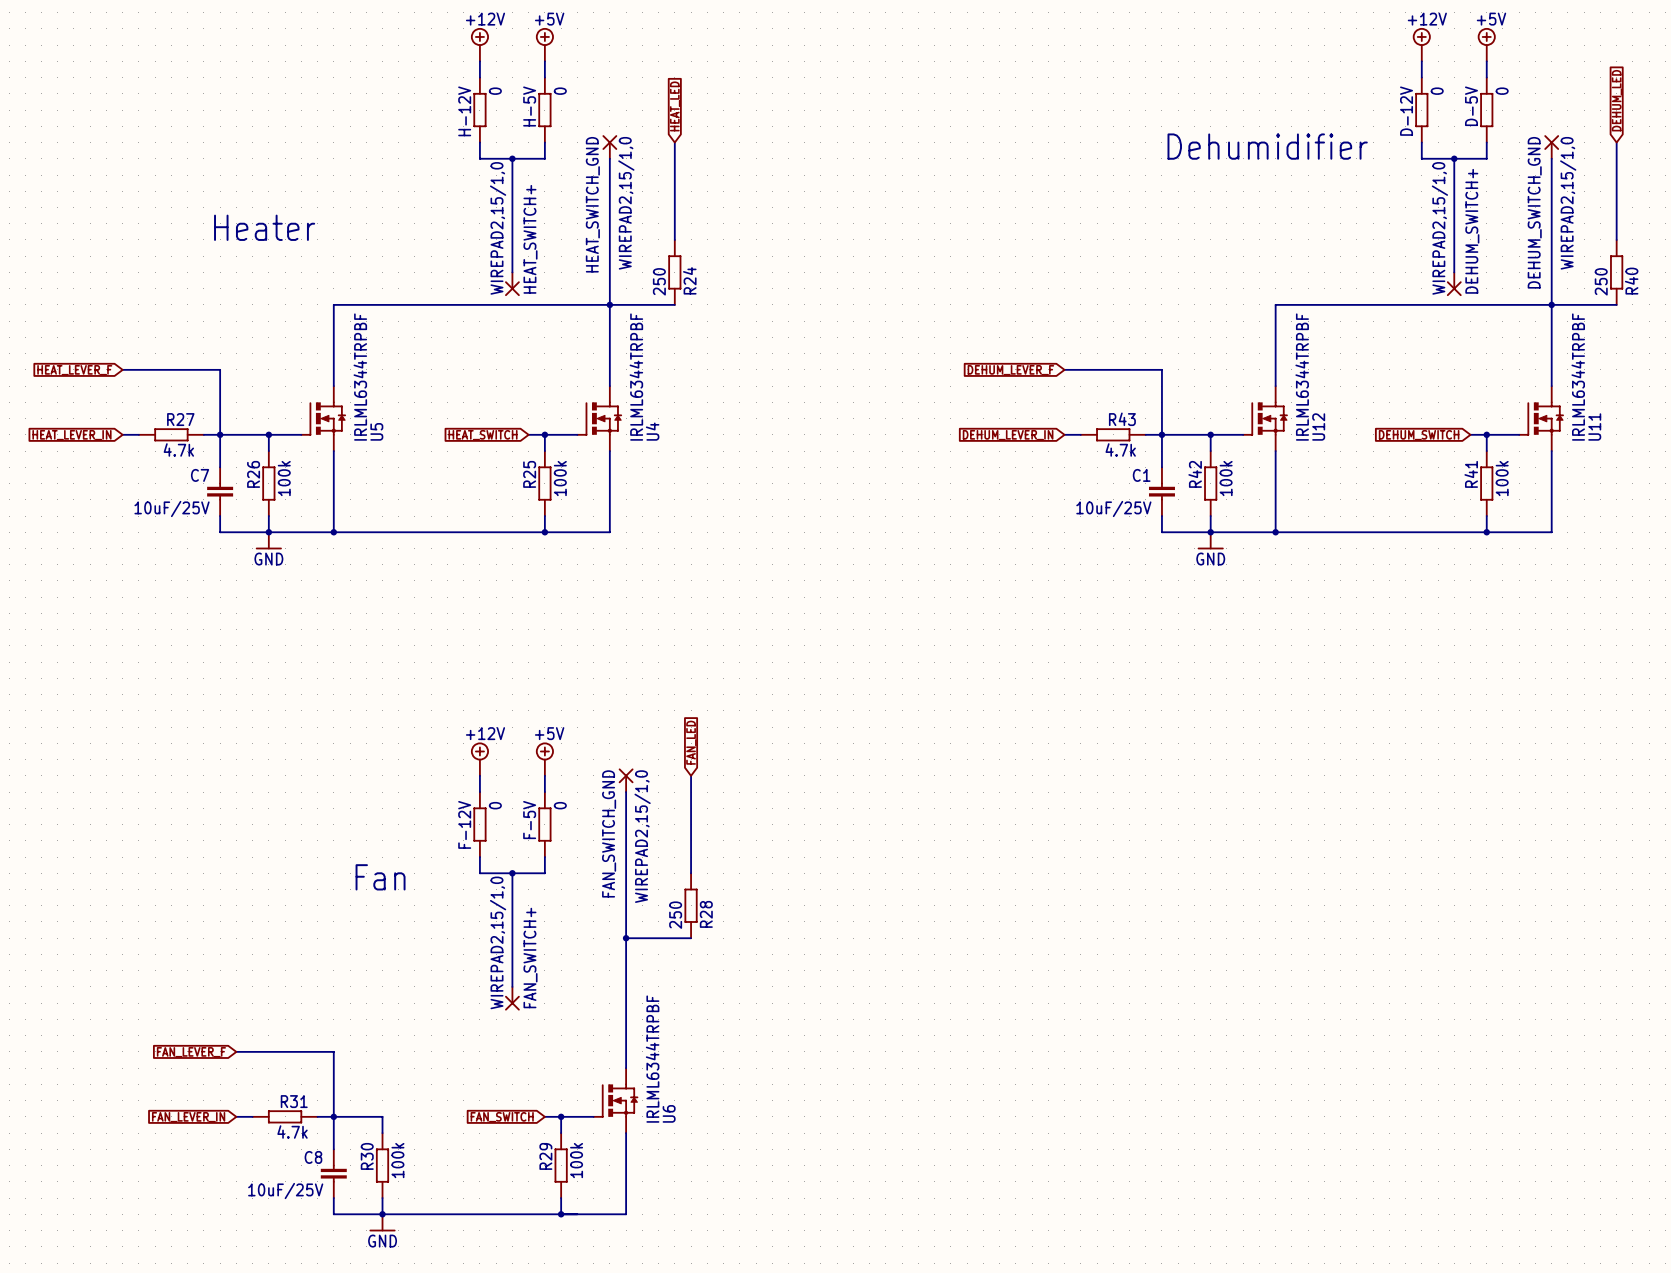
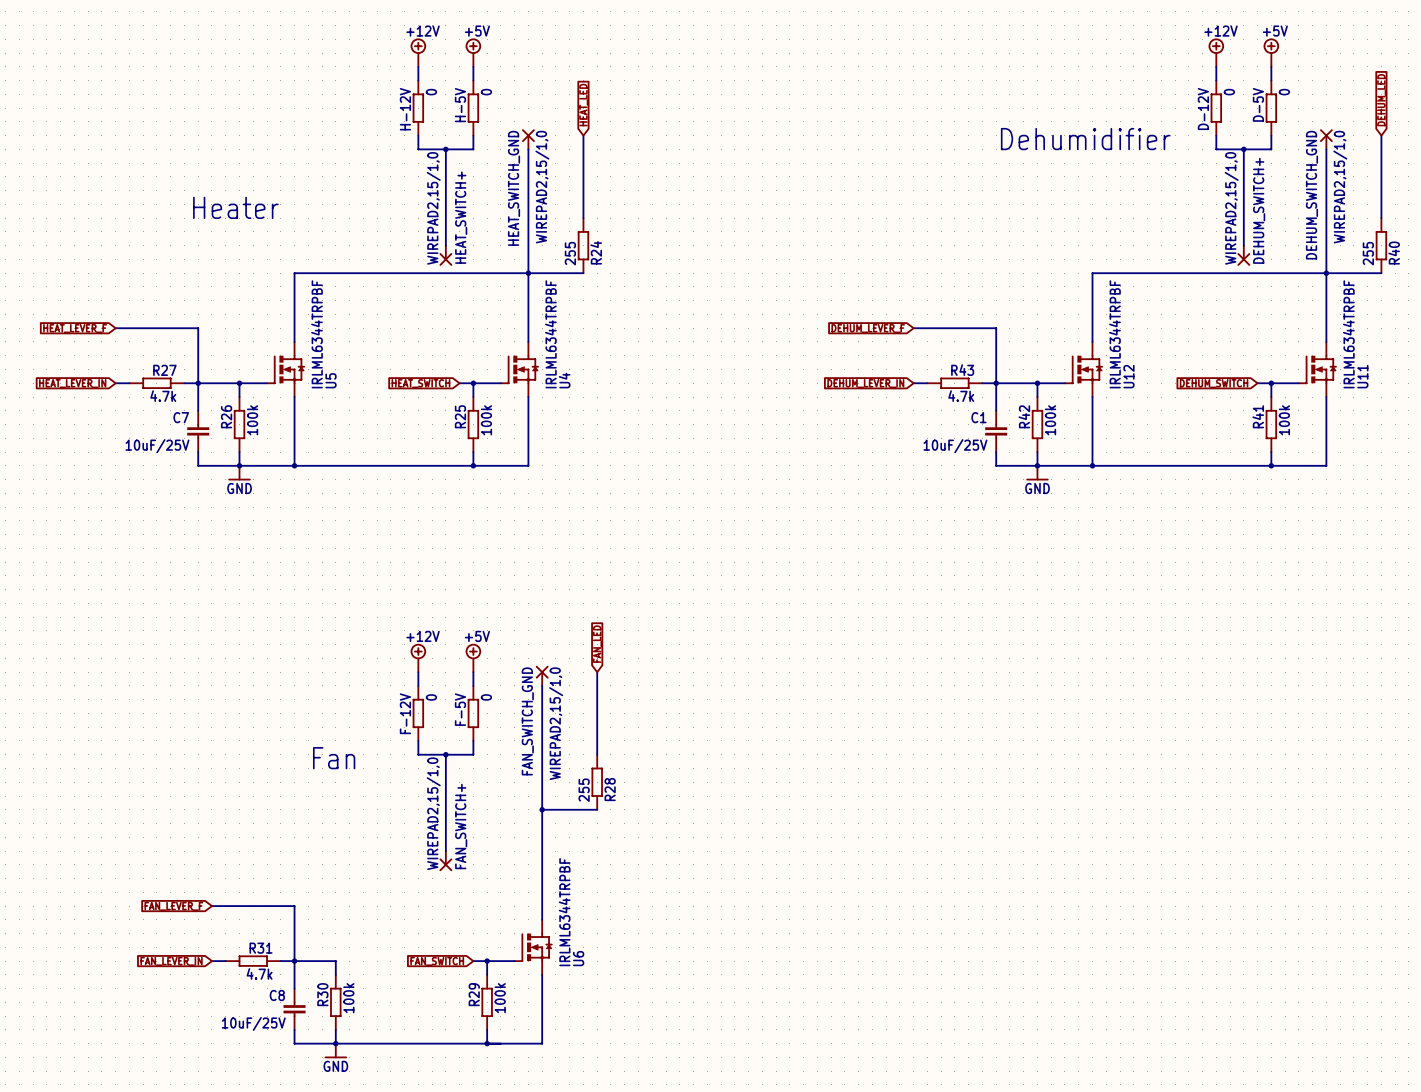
R24 value: 250 (659, 281) -> 255 (570, 253)
R40 value: 250 (1601, 281) -> 255 (1368, 253)
R28 value: 250 (675, 915) -> 255 (584, 790)

